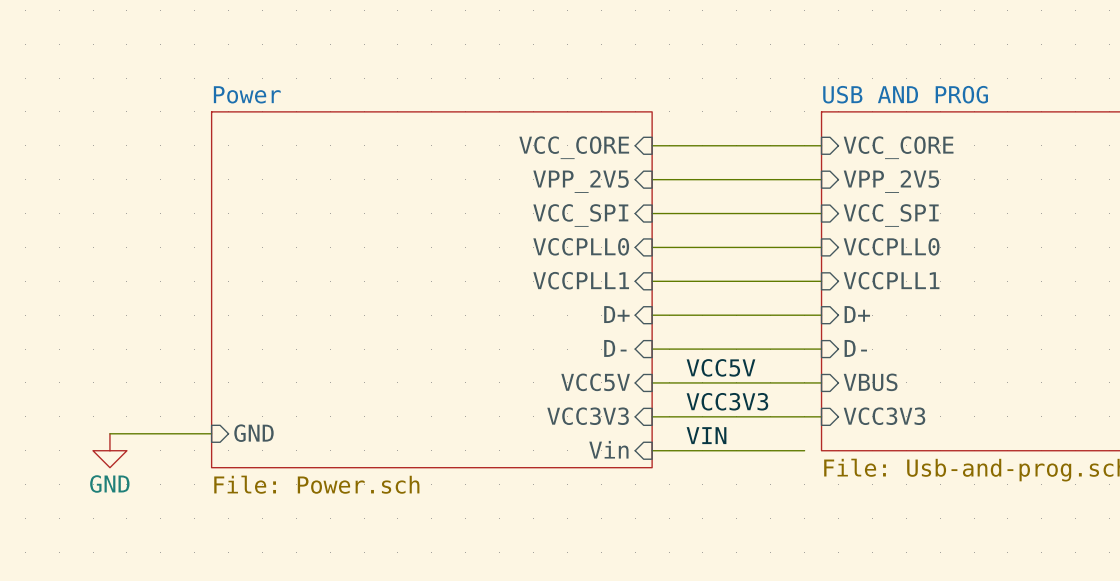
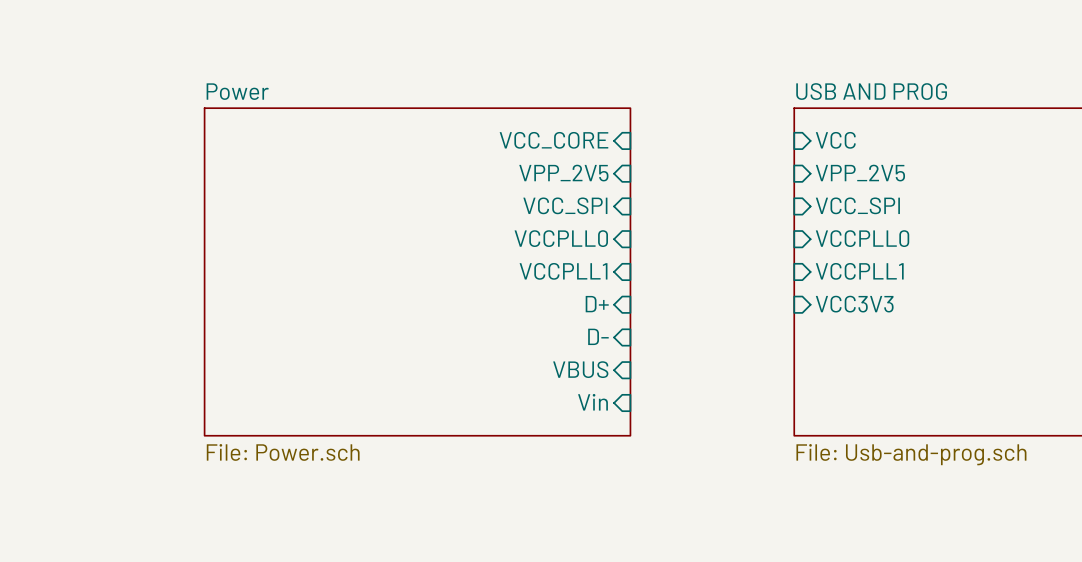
sheet Power shape: [211, 111, 653, 468] -> [204, 108, 631, 436]
wire: (652, 145) (821, 145) -> none
sheet pin: VCC_CORE (898, 147) -> VCC (835, 140)
wire: (652, 179) (821, 179) -> none
wire: (652, 213) (821, 213) -> none
wire: (652, 247) (821, 247) -> none
wire: (652, 281) (821, 281) -> none
sheet pin: D+ (857, 314) -> VCC3V3 (854, 304)
wire: (652, 315) (821, 315) -> none
sheet pin: D- (855, 348) -> none
wire: (652, 349) (821, 349) -> none
label: VCC5V (720, 367) -> none
sheet pin: VCC5V (595, 382) -> VBUS (580, 369)
wire: (652, 382) (821, 382) -> none
sheet pin: VBUS (870, 382) -> none
label: VCC3V3 (727, 401) -> none
sheet pin: VCC3V3 (588, 416) -> Vin (593, 402)
wire: (652, 416) (821, 416) -> none
sheet pin: VCC3V3 (884, 416) -> none
wire: (109, 433) (211, 433) -> none
sheet pin: GND (253, 433) -> none
label: VIN (706, 435) -> none
sheet pin: Vin (608, 449) -> none
power symbol: GND (109, 450) -> none
wire: (652, 450) (804, 450) -> none

